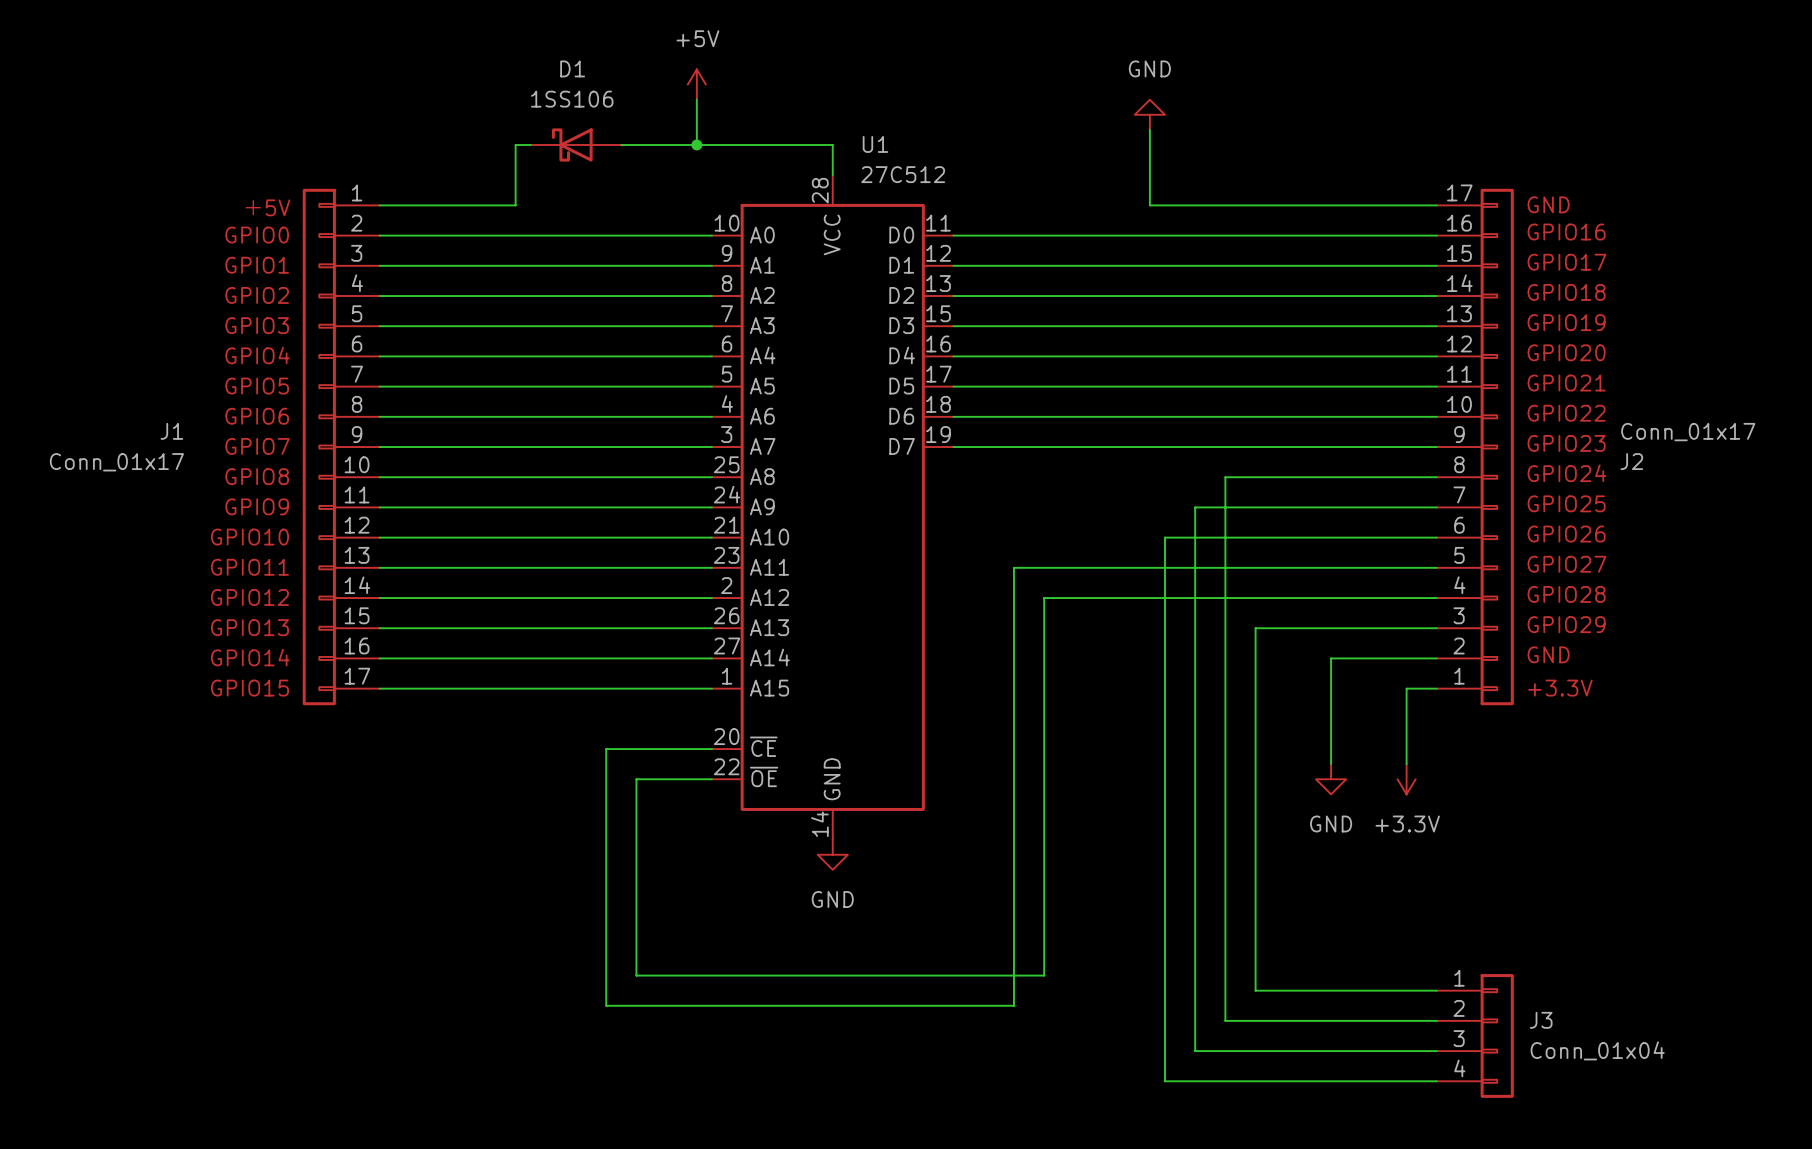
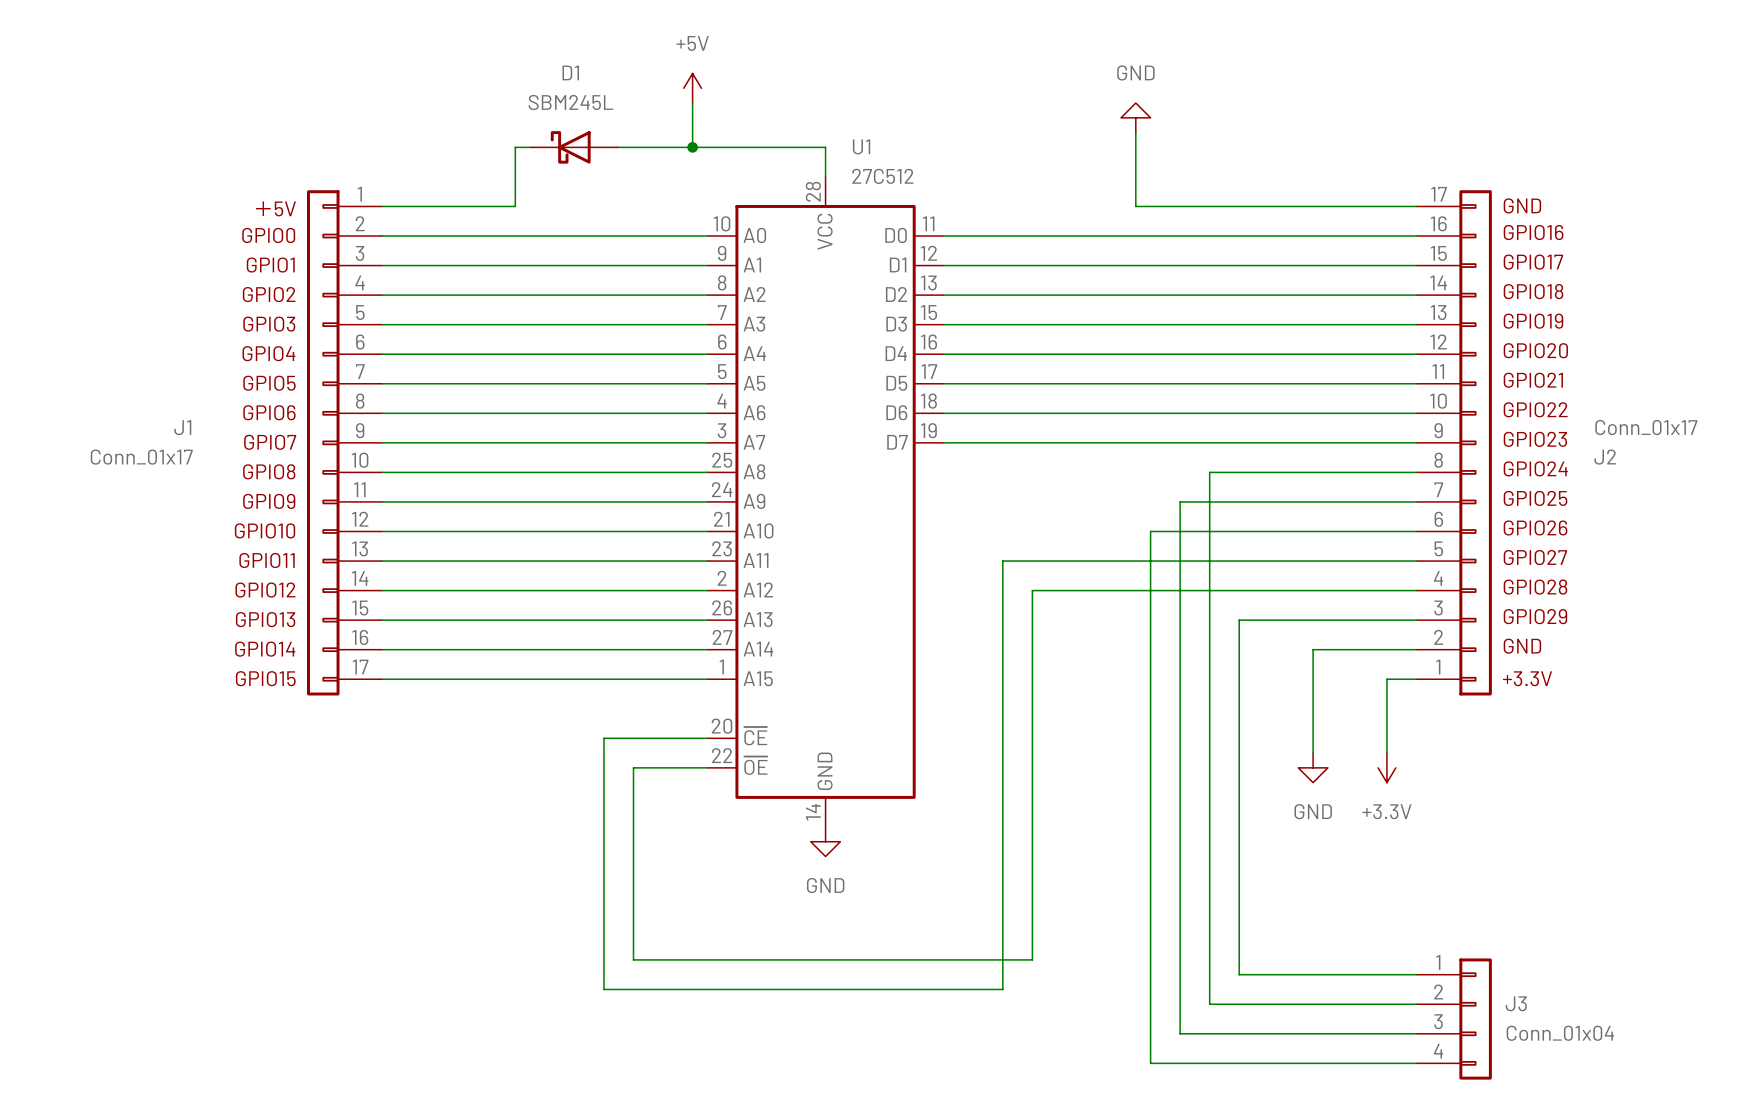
D1 value: 1SS106 (572, 99) -> SBM245L (570, 102)

